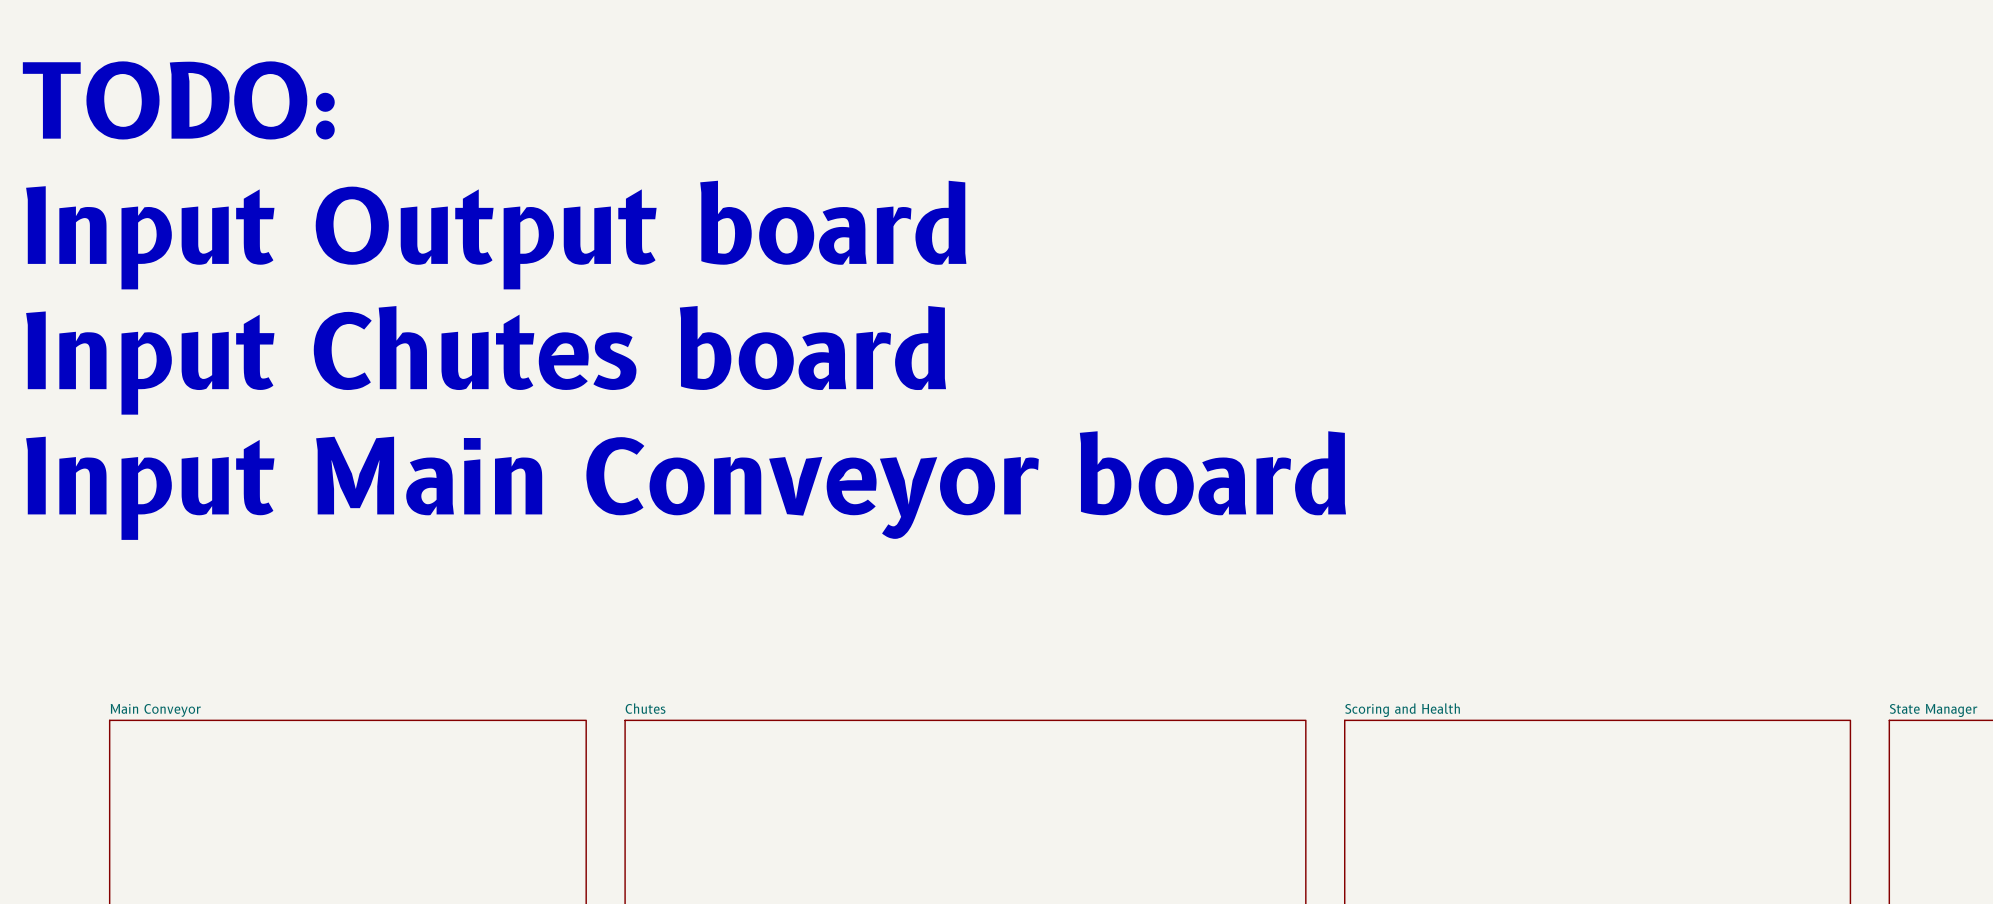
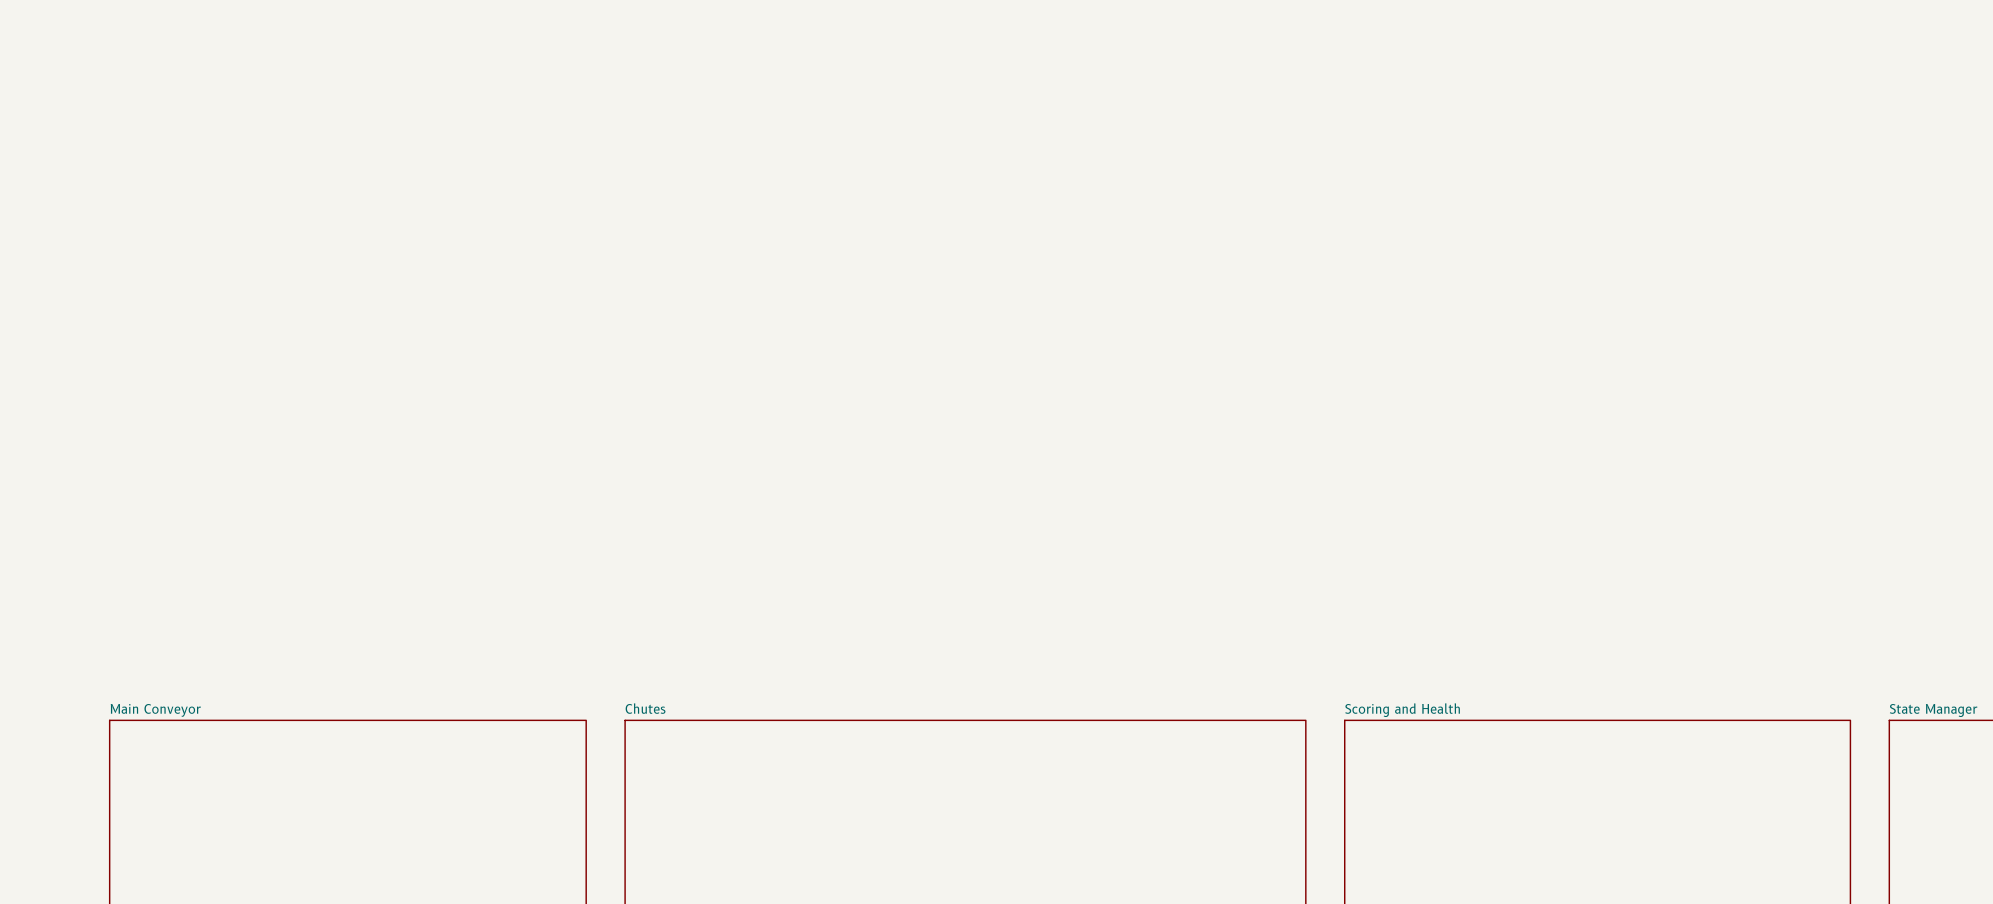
text: TODO: (178, 100) -> none
text: Input Output board (496, 235) -> none
text: Input Chutes board (486, 360) -> none
text: Input Main Conveyor board (686, 485) -> none

